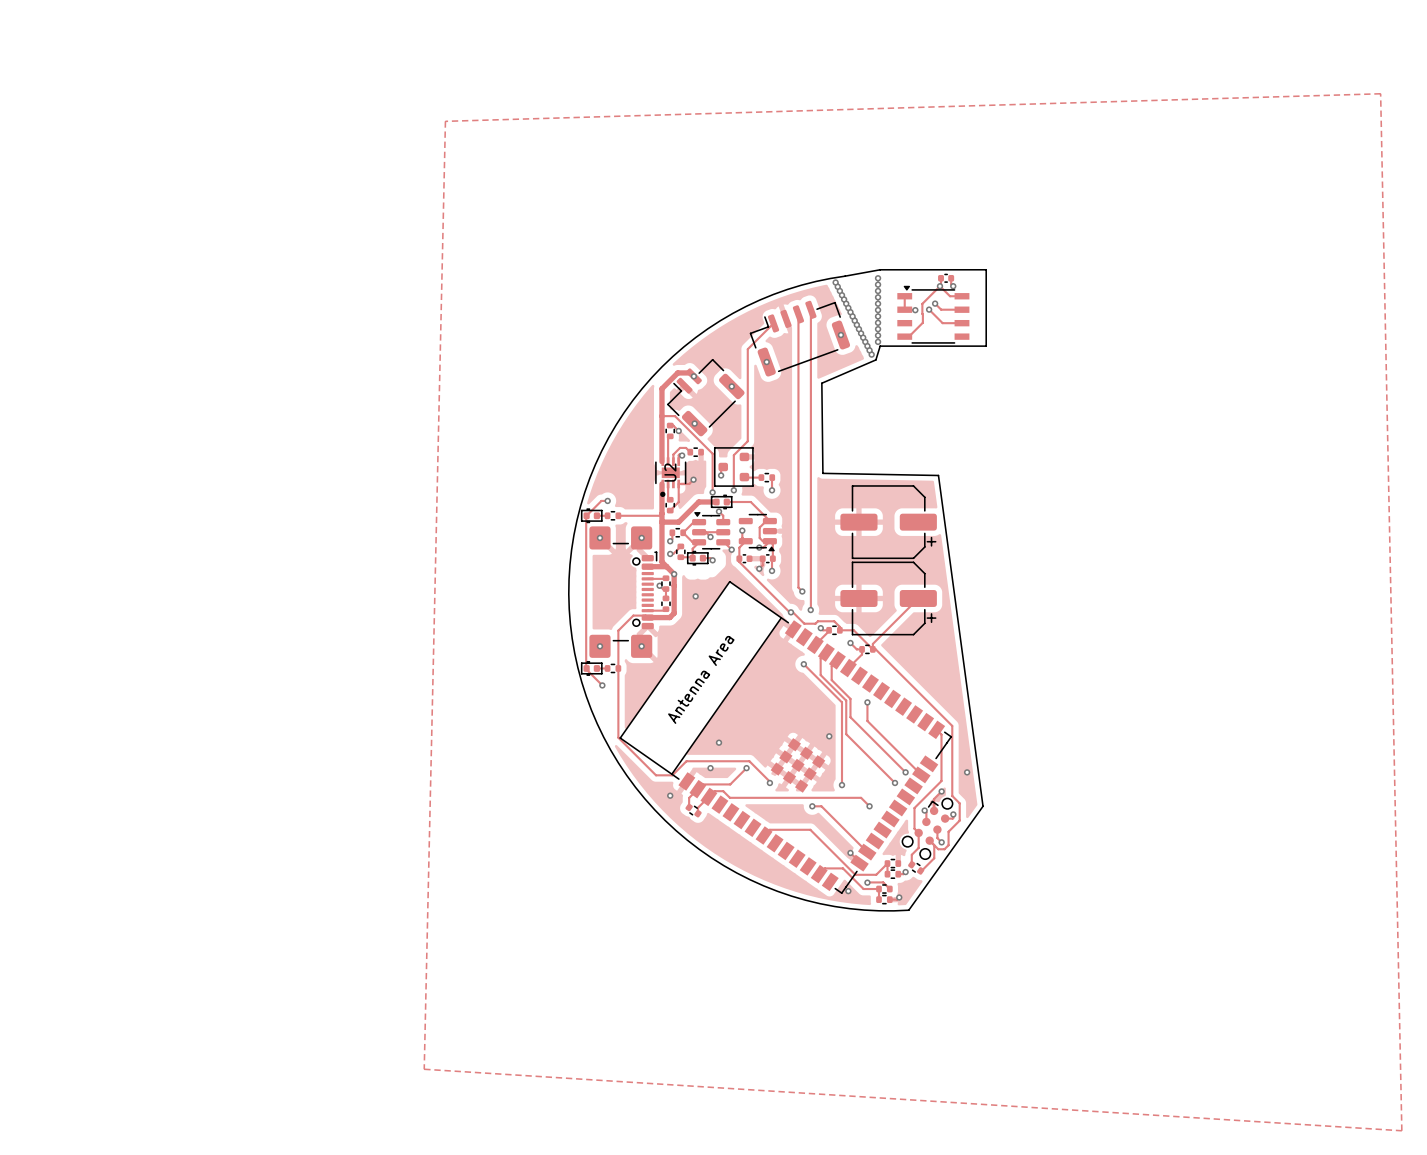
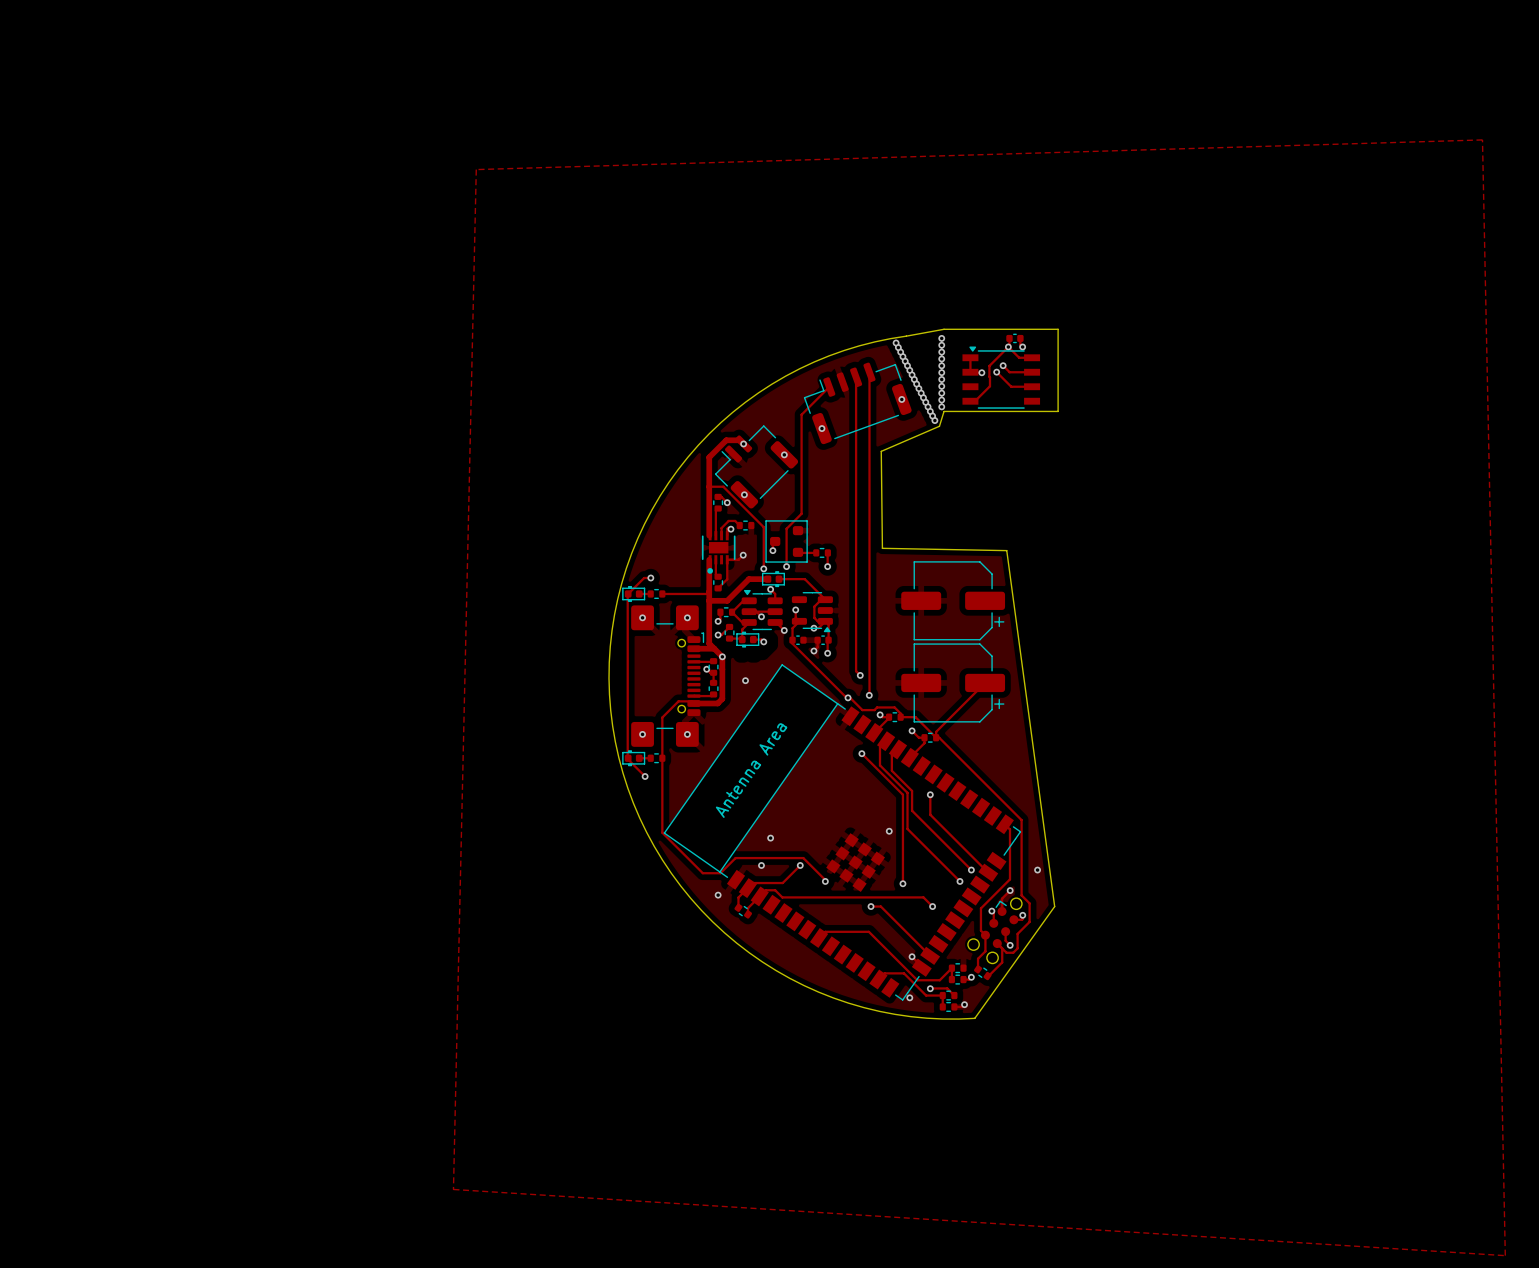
U2 name: U2 (670, 472) -> none

